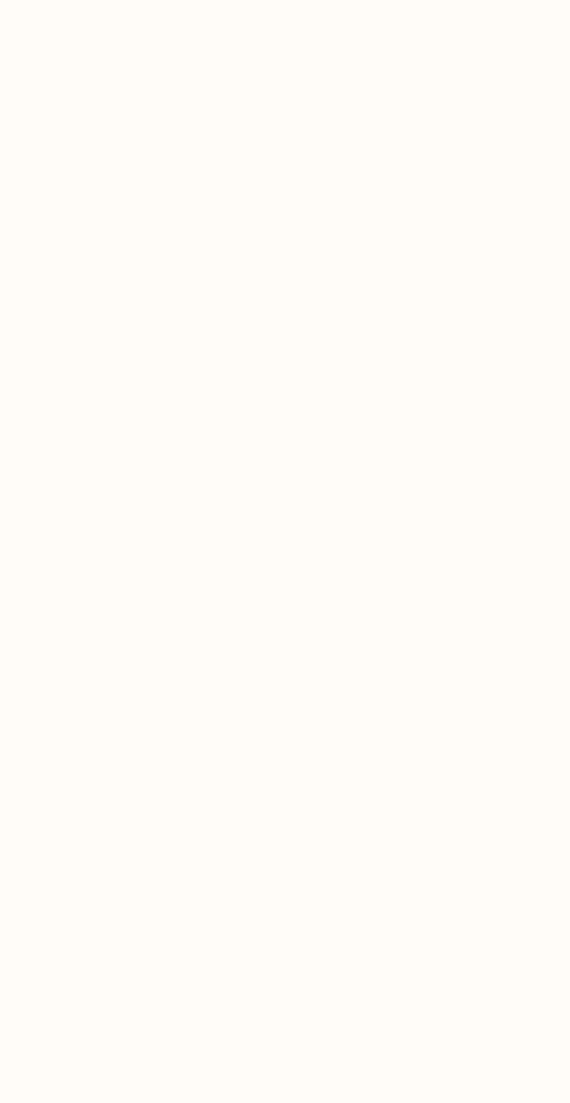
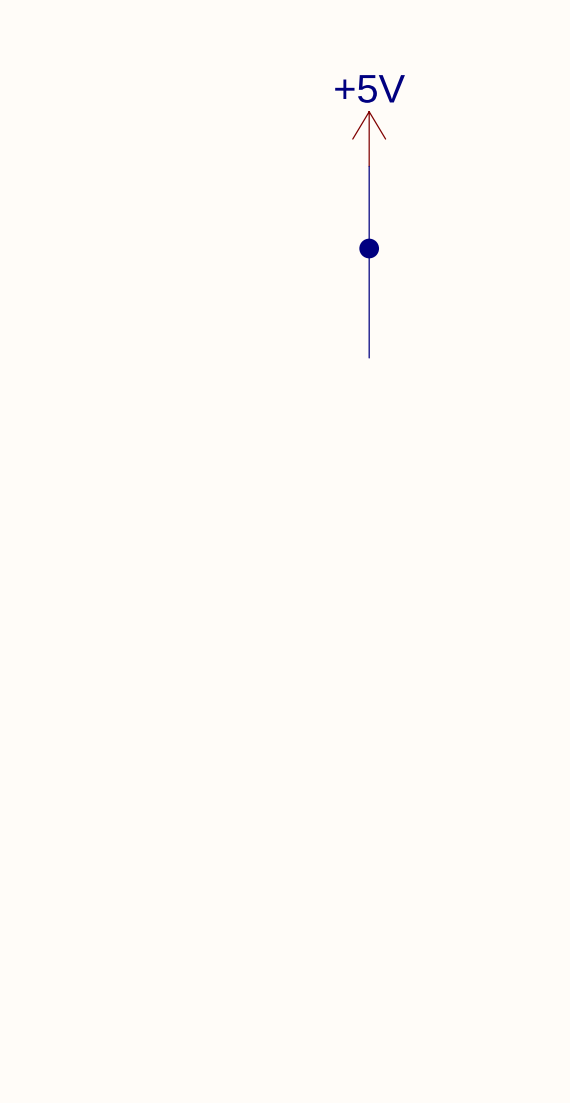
power symbol: none -> +5V (369, 139)
wire: none -> (369, 166) (369, 357)
junction: none -> (369, 248)

